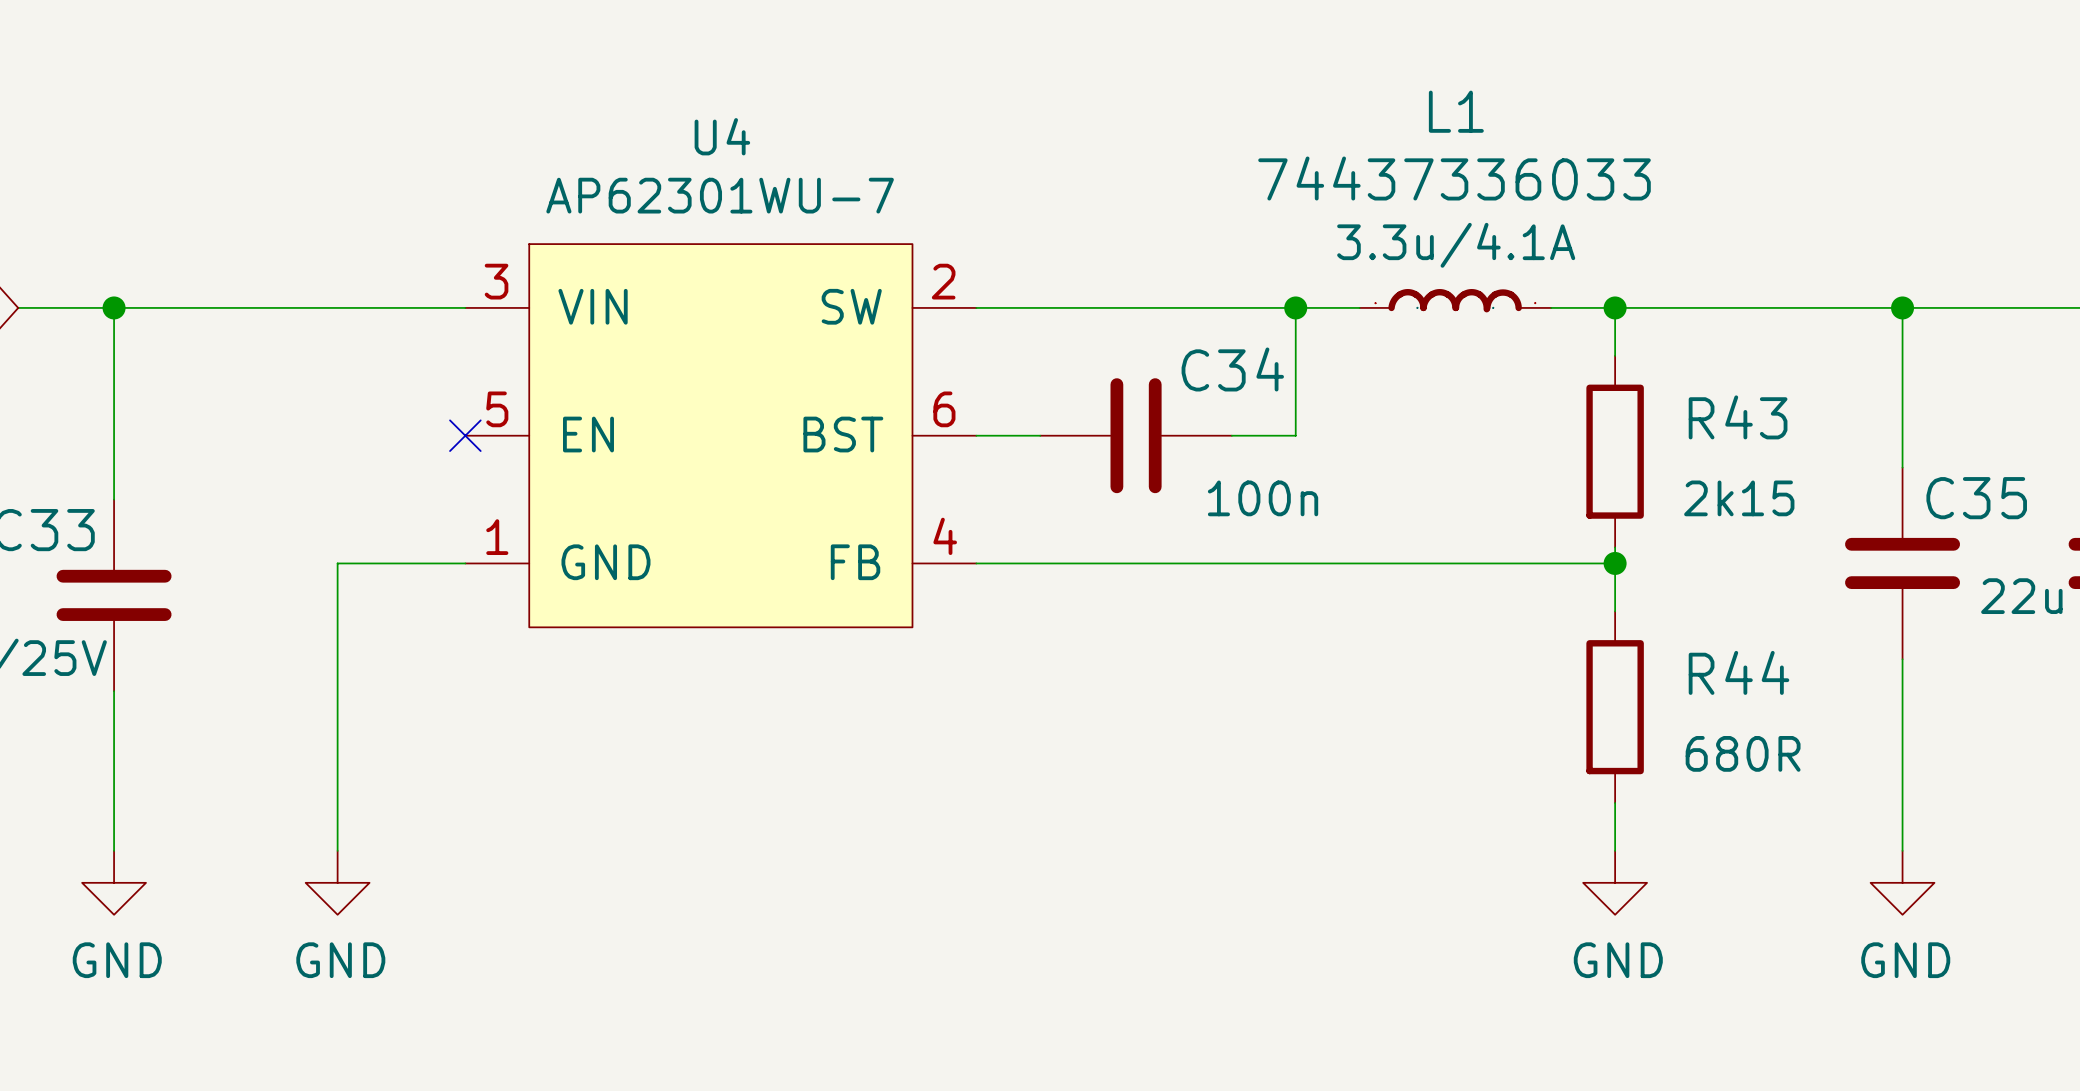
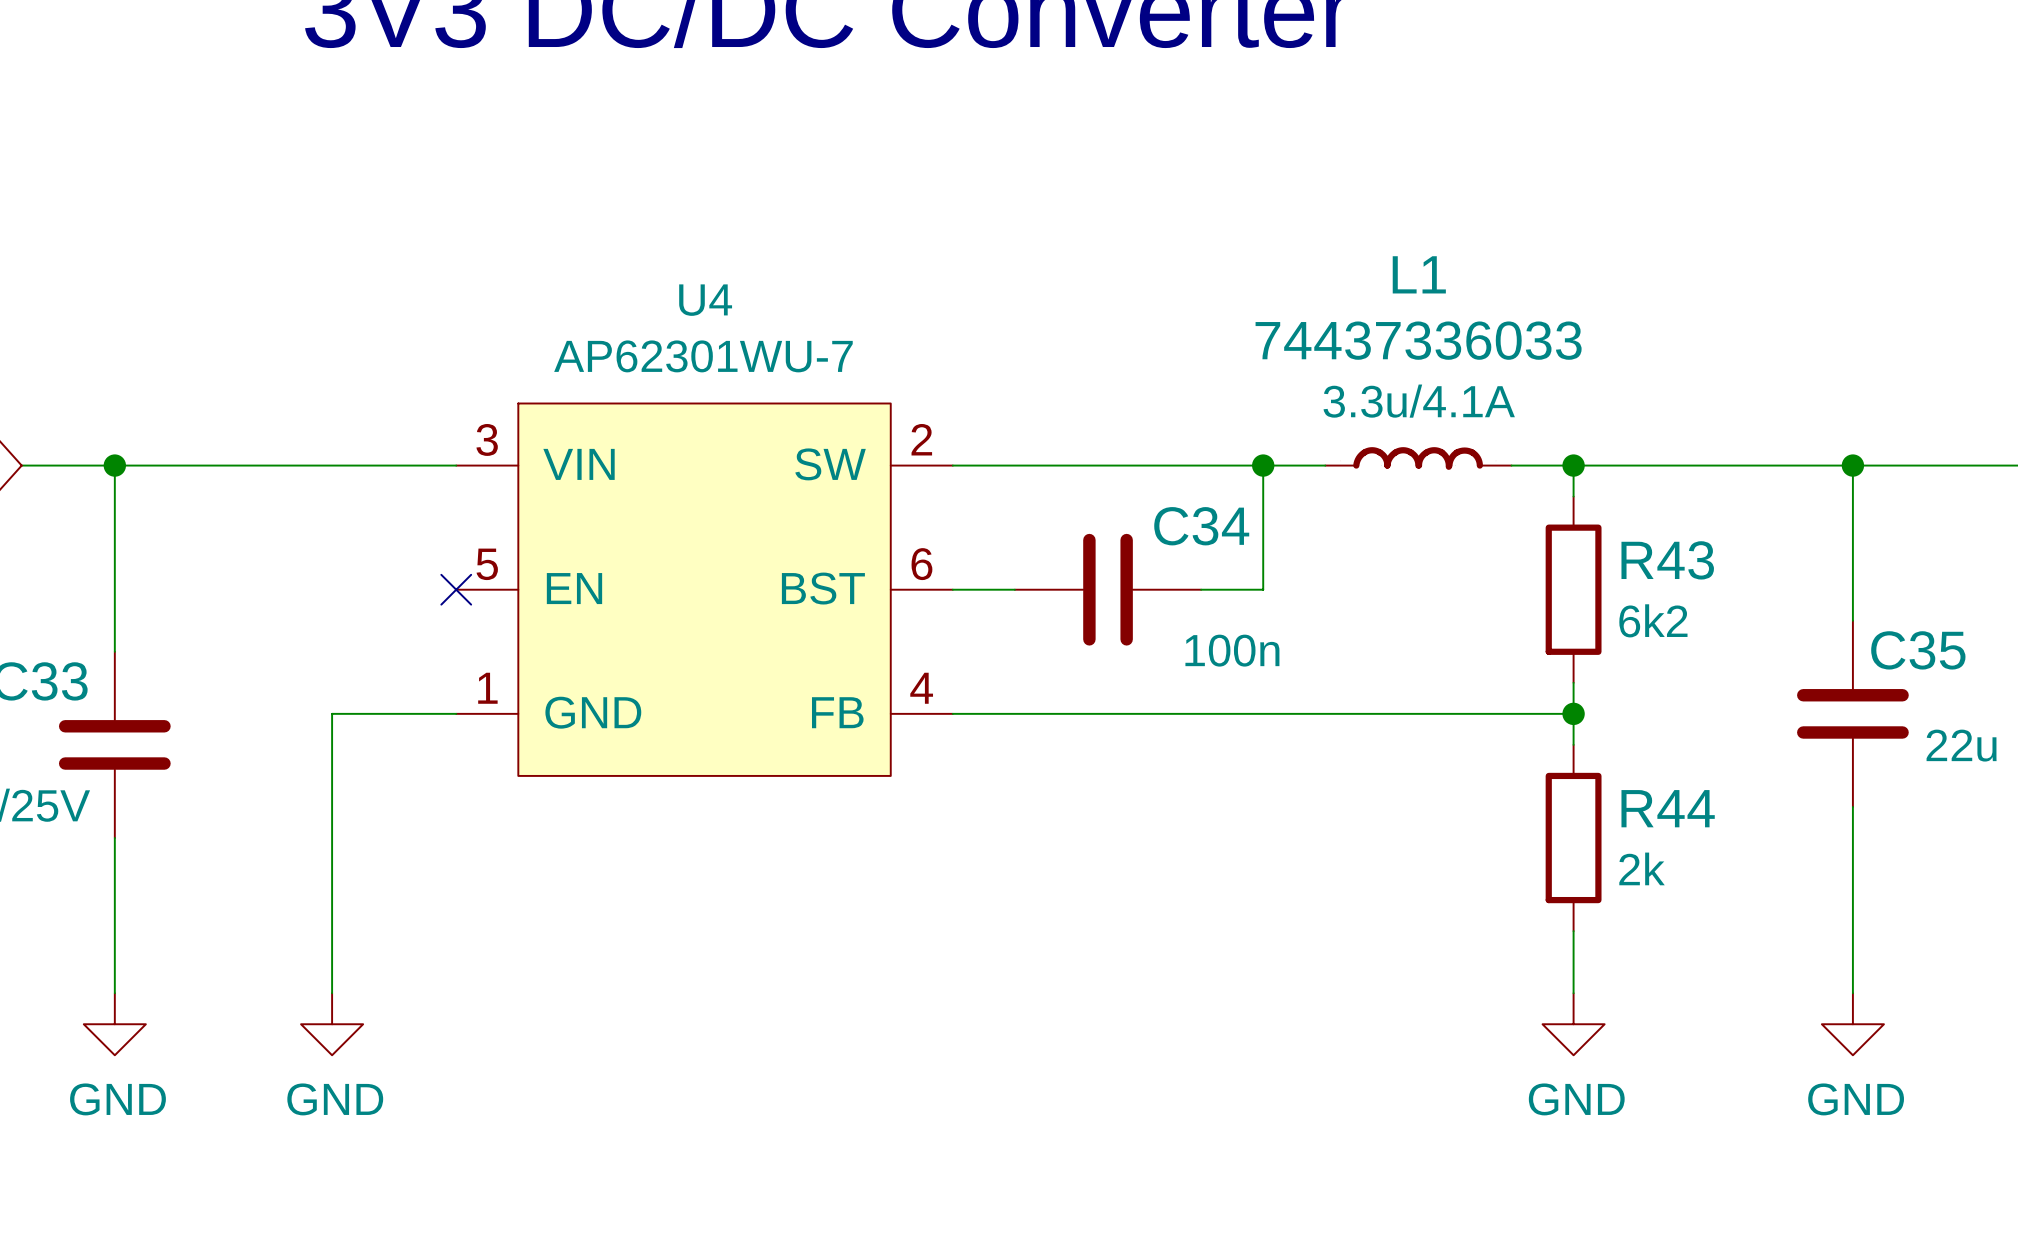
R43 name position: R43 (1738, 417) -> R43 (1667, 560)
R43 position: (1615, 451) -> (1573, 589)
R43 text: 2k15 (1739, 498) -> 6k2 (1653, 620)
R44 name position: R44 (1738, 672) -> R44 (1668, 808)
R44 position: (1615, 707) -> (1573, 838)
R44 text: 680R (1743, 753) -> 2k (1642, 868)

